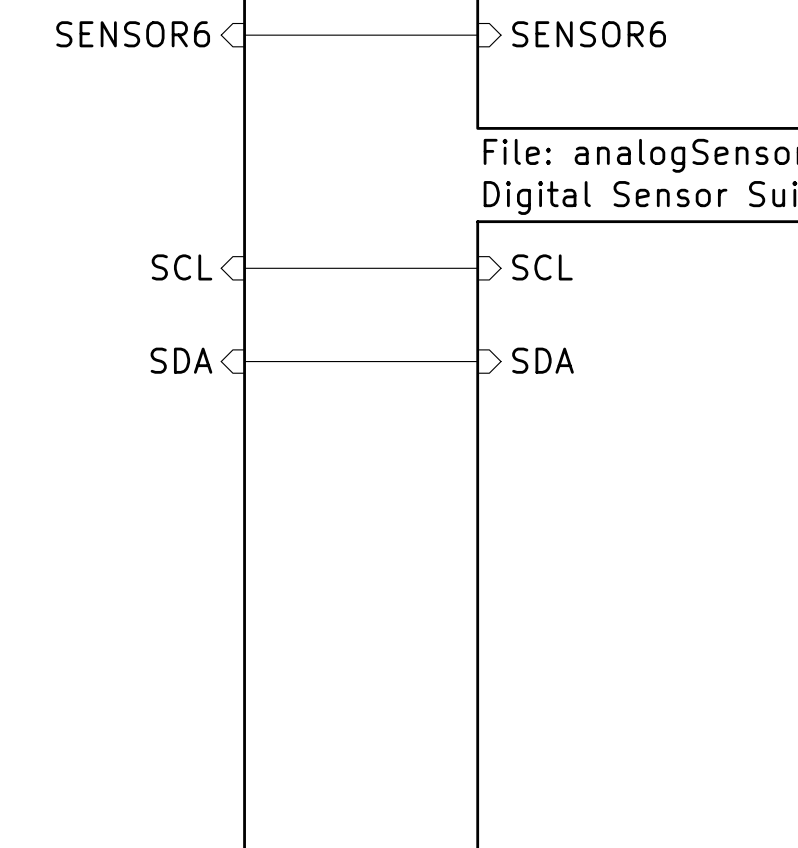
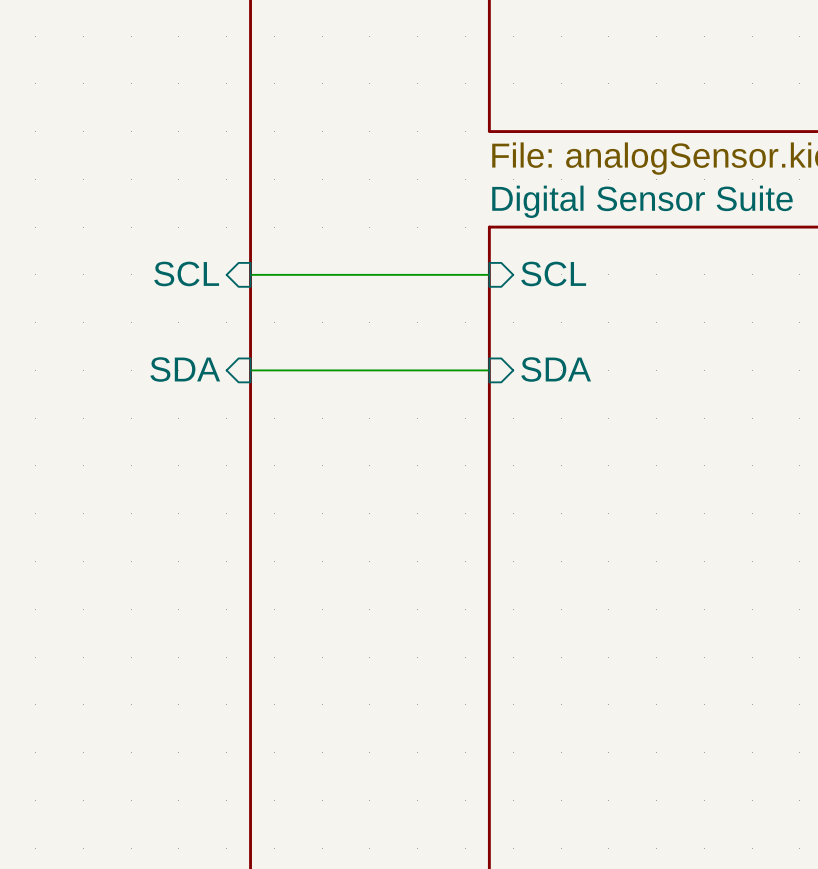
sheet pin: SENSOR6 (133, 34) -> none
sheet pin: SENSOR6 (589, 34) -> none
wire: (244, 35) (477, 35) -> none

